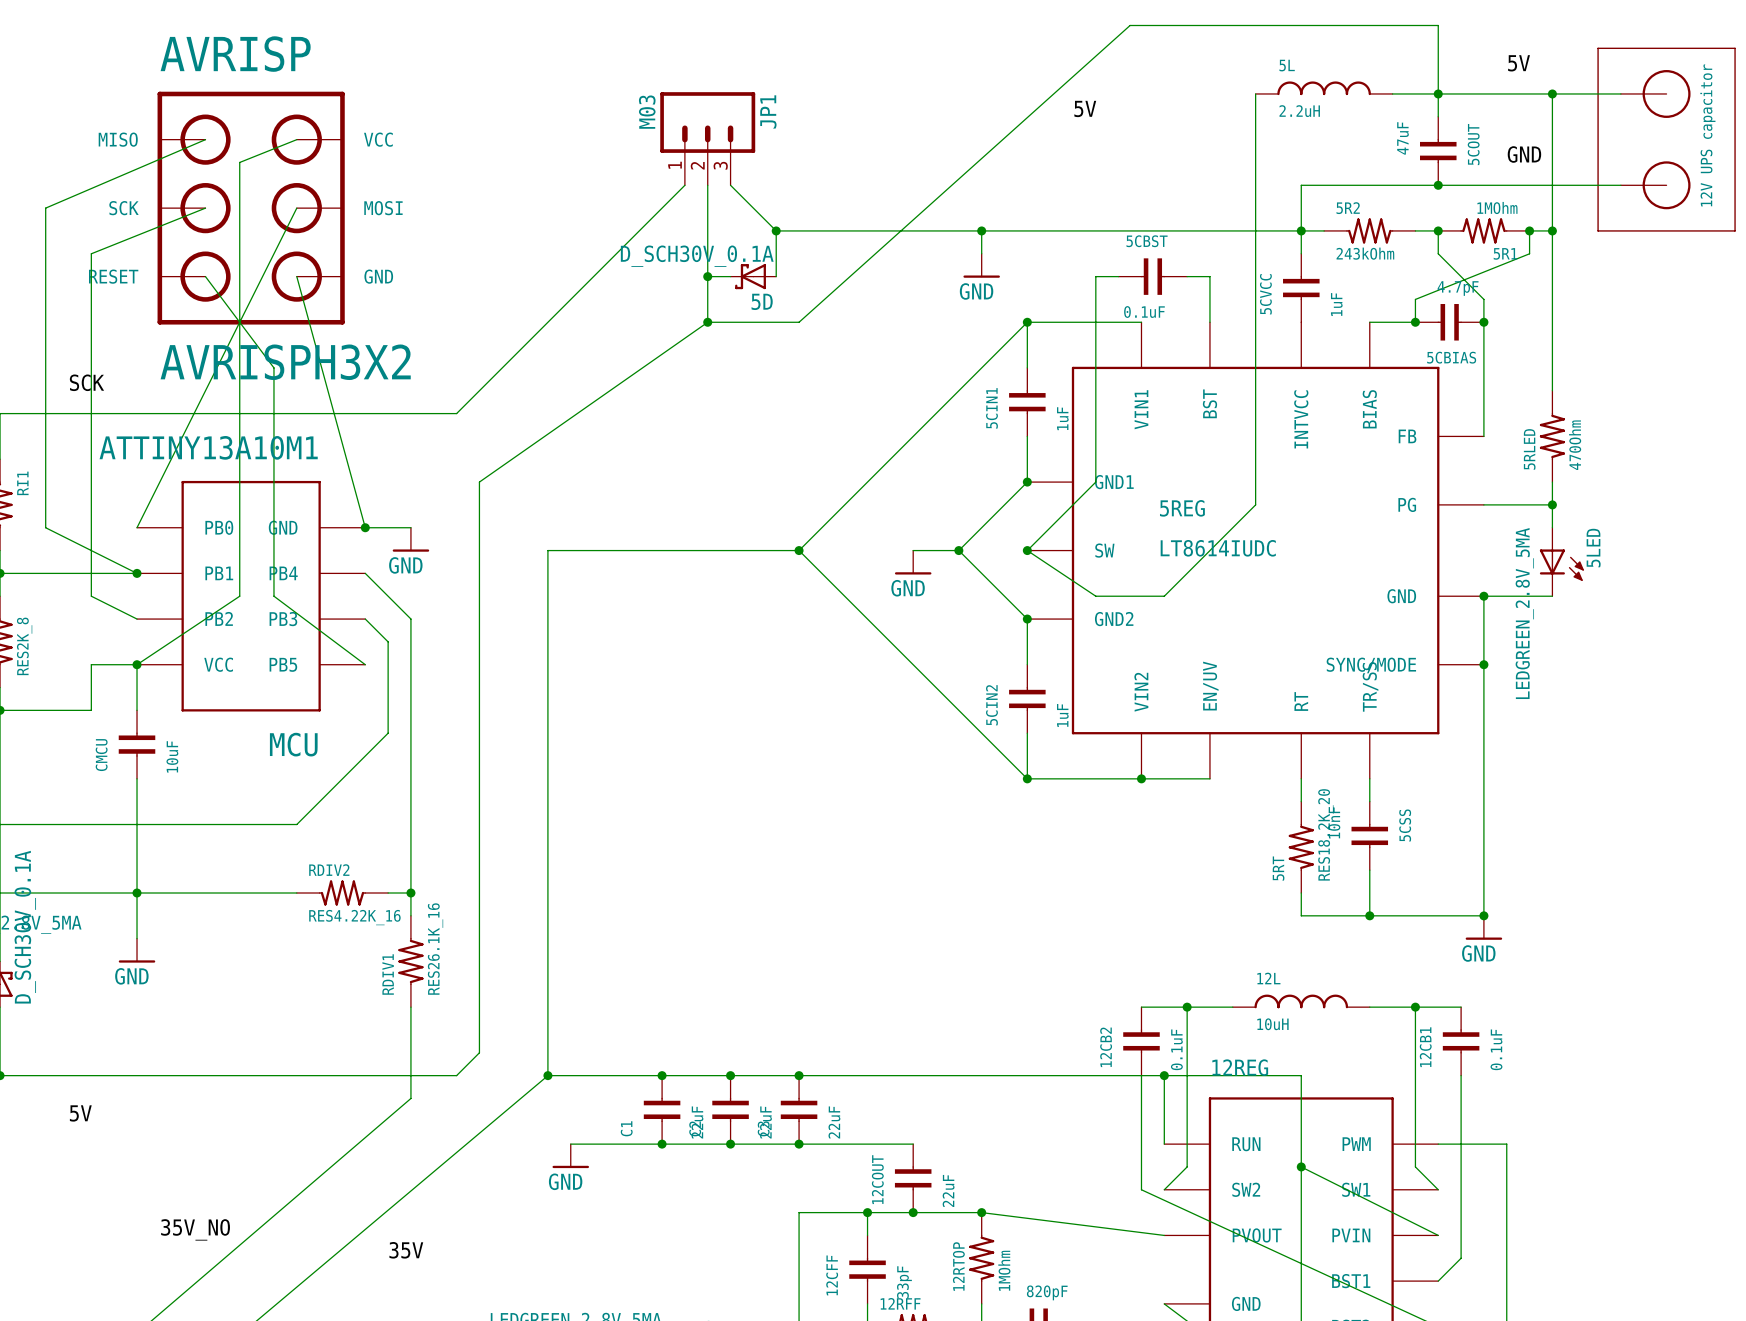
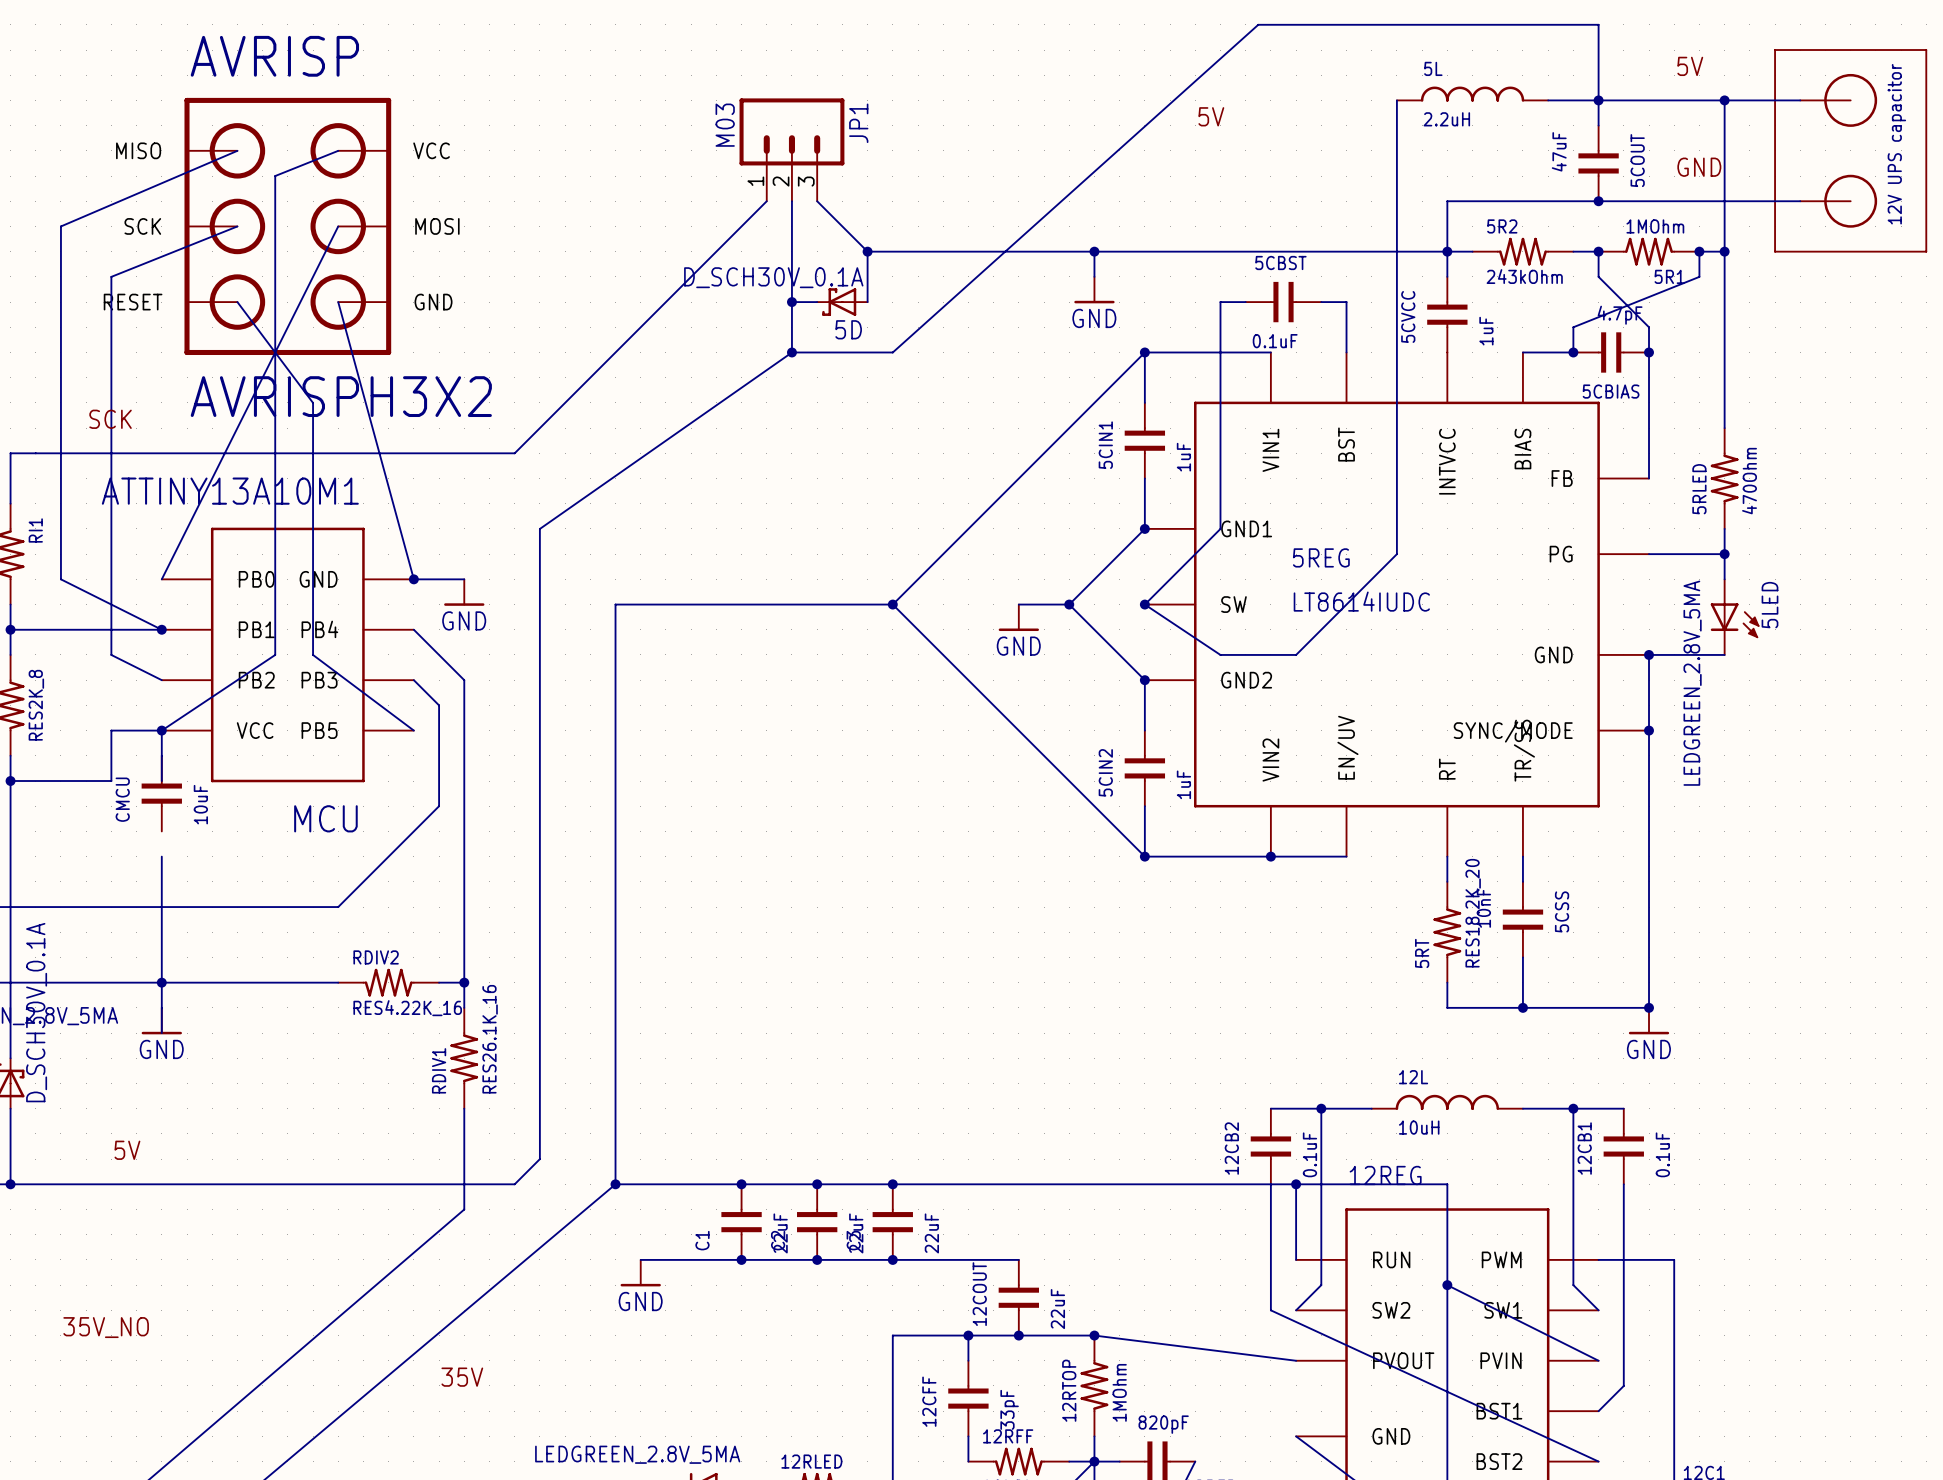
CMCU position: (137, 744) -> (161, 793)
power symbol position: GND (137, 950) -> GND (161, 1021)
label position: 5V (80, 1113) -> 5V (127, 1150)
label position: 35V_NO (195, 1229) -> 35V_NO (106, 1327)

